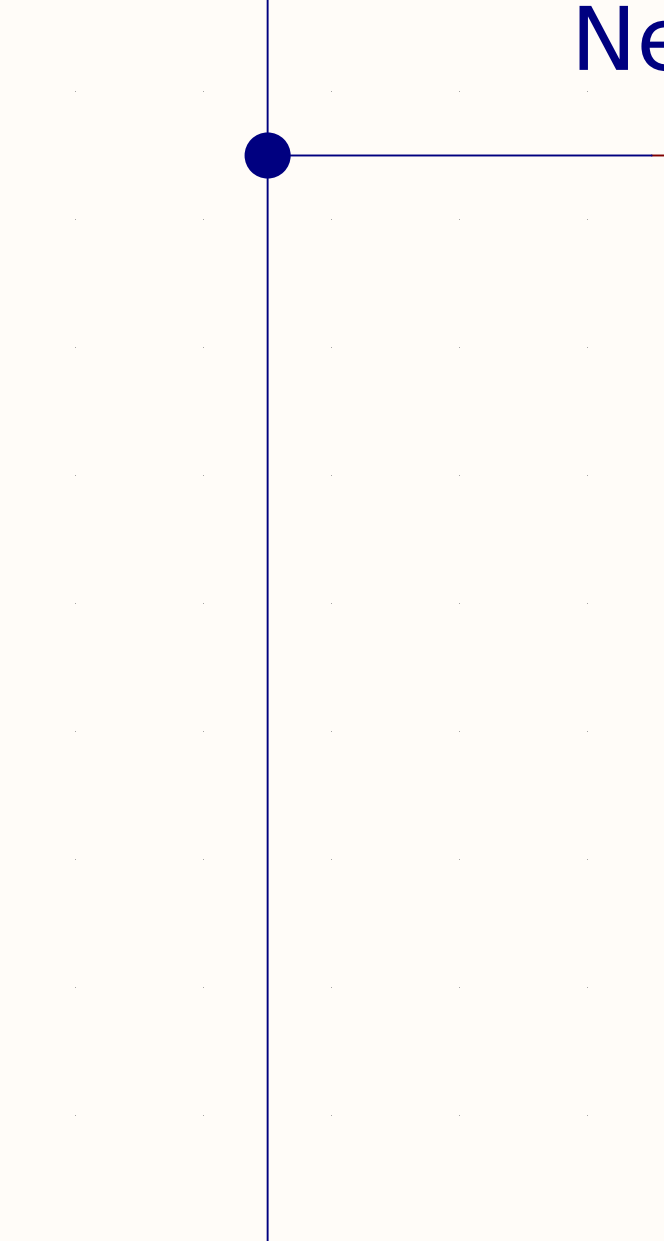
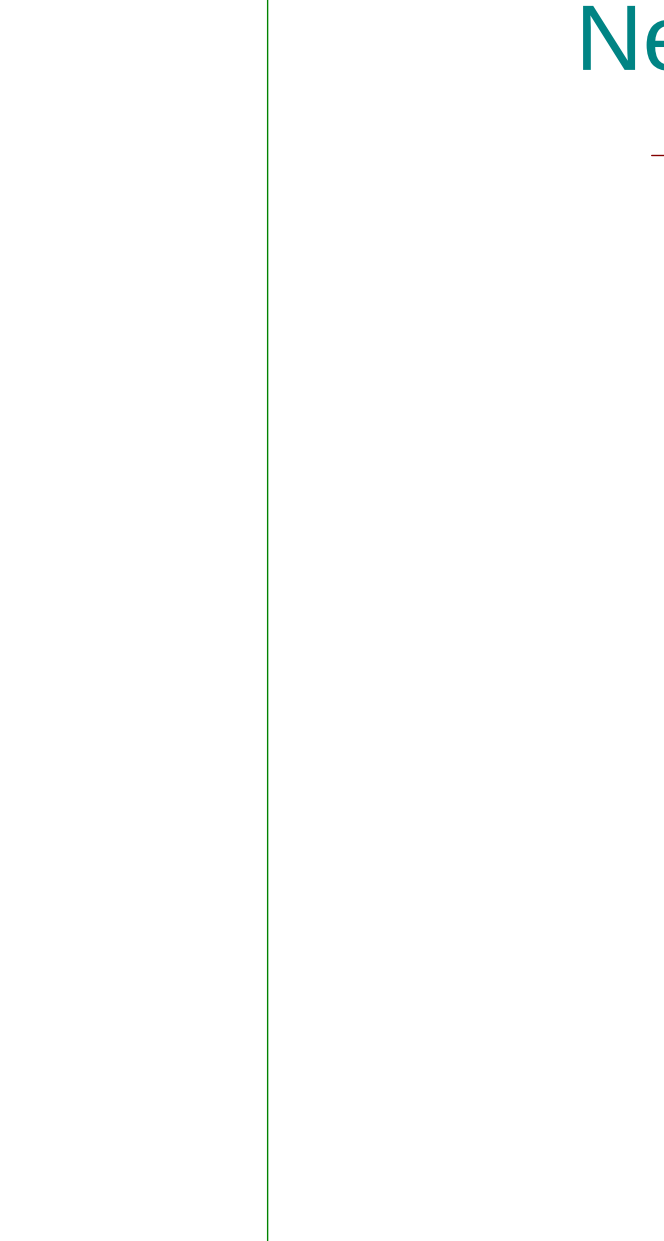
wire: (267, 155) (651, 155) -> none
junction: (267, 155) -> none

